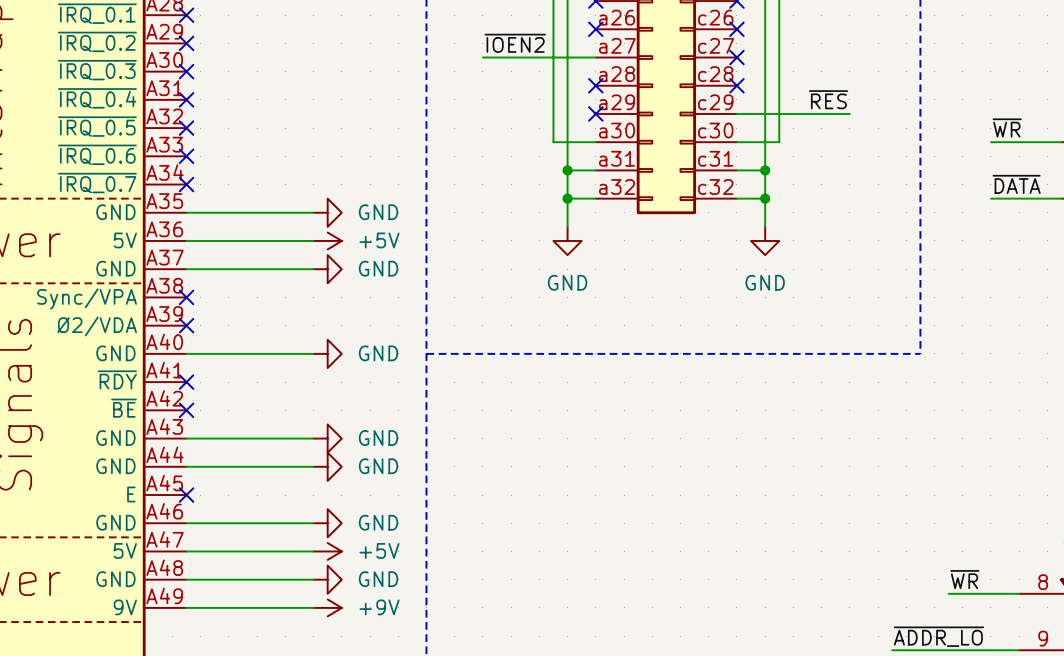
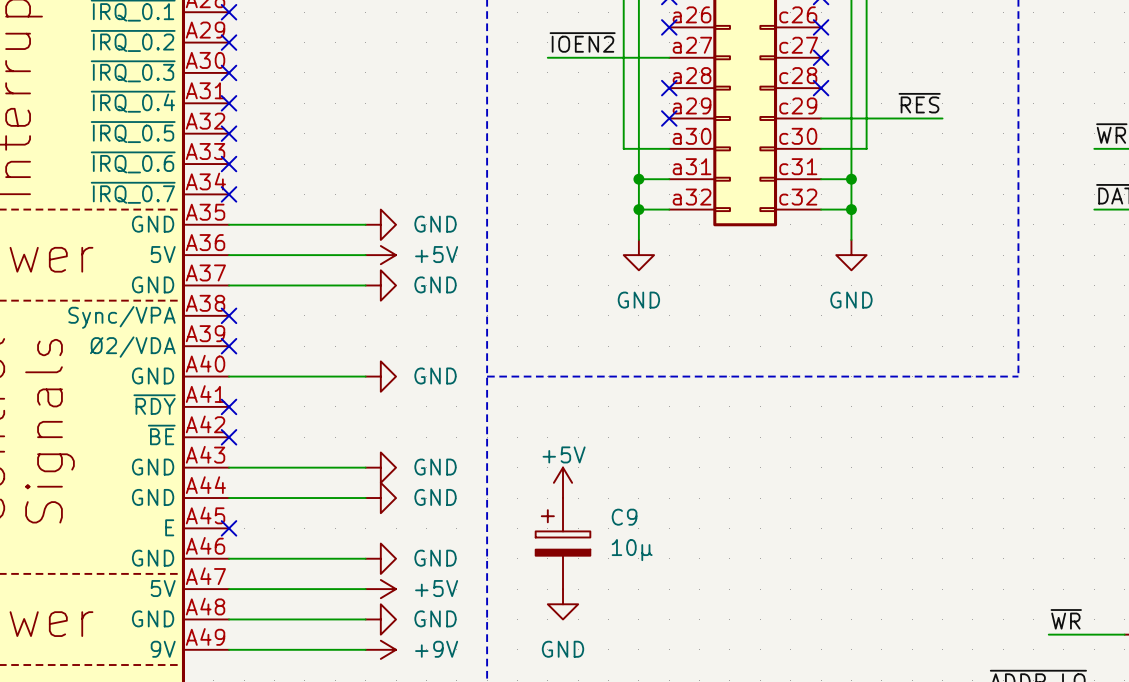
power symbol: none -> +5V (563, 482)
C9: none -> 10µ (563, 543)
power symbol: none -> GND (563, 604)

